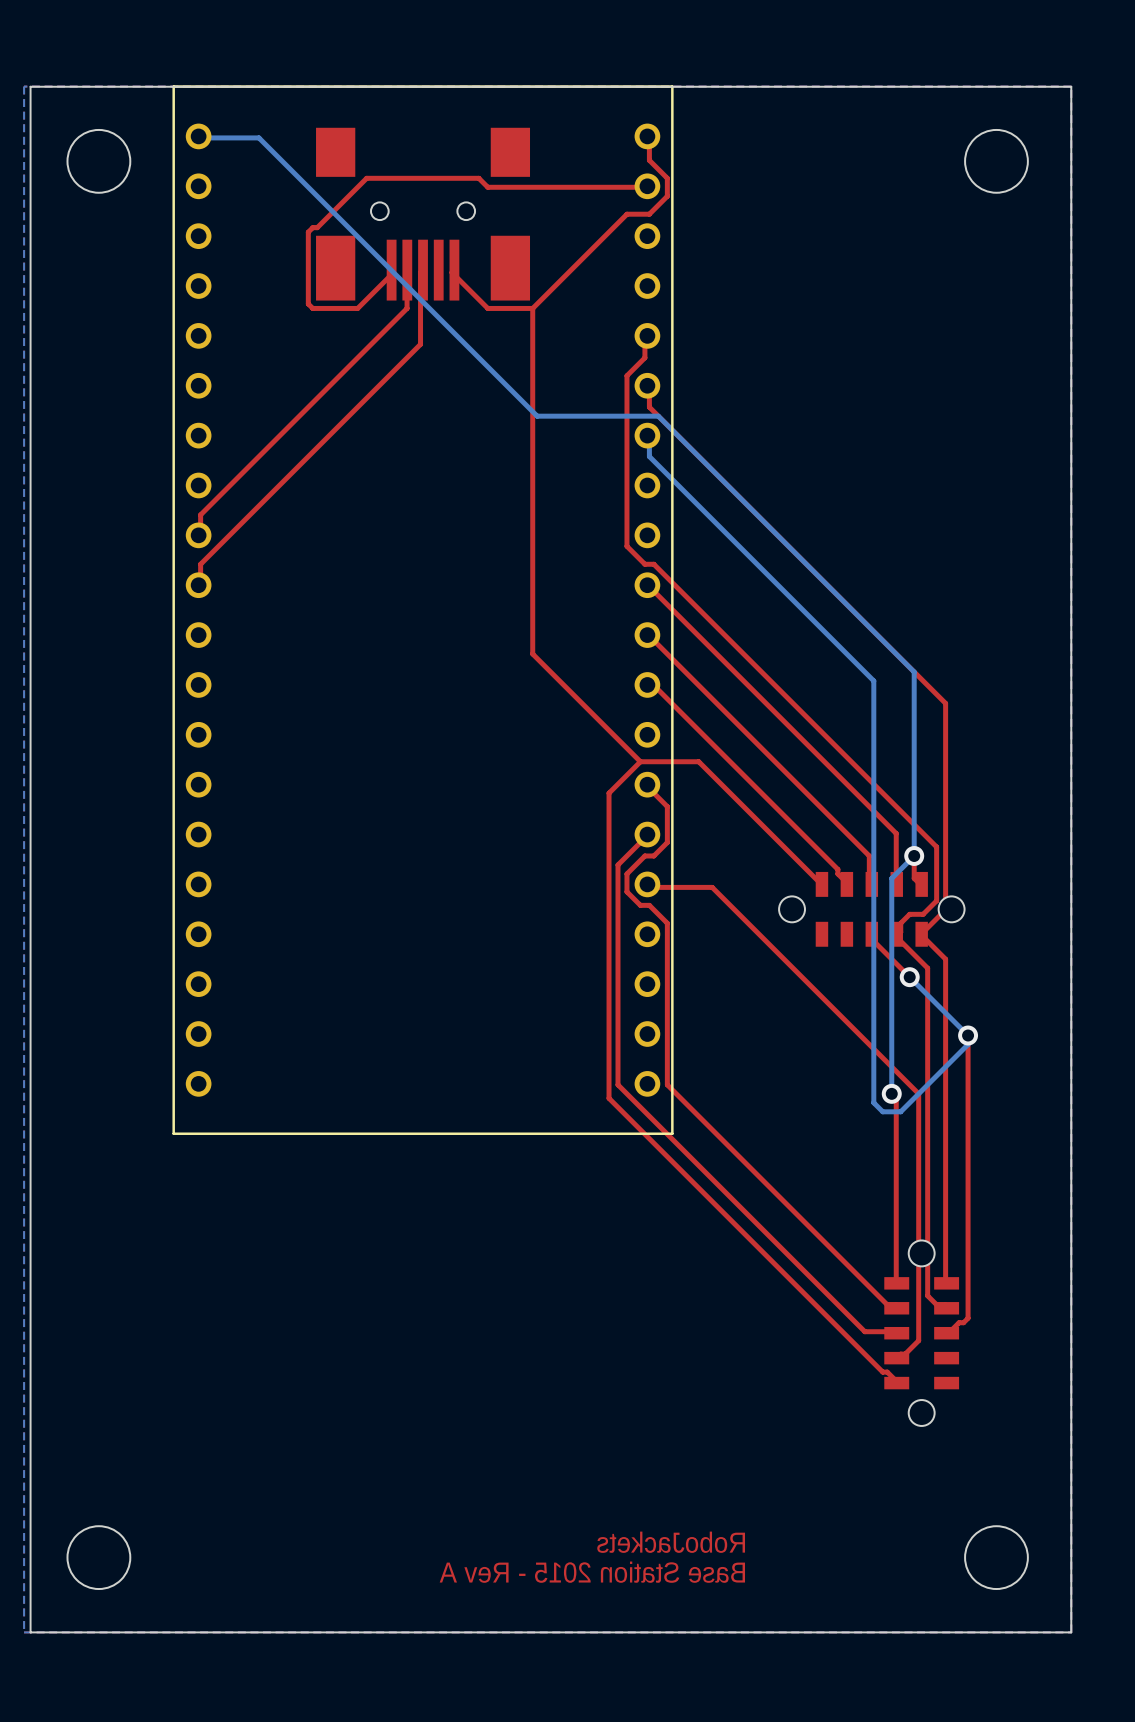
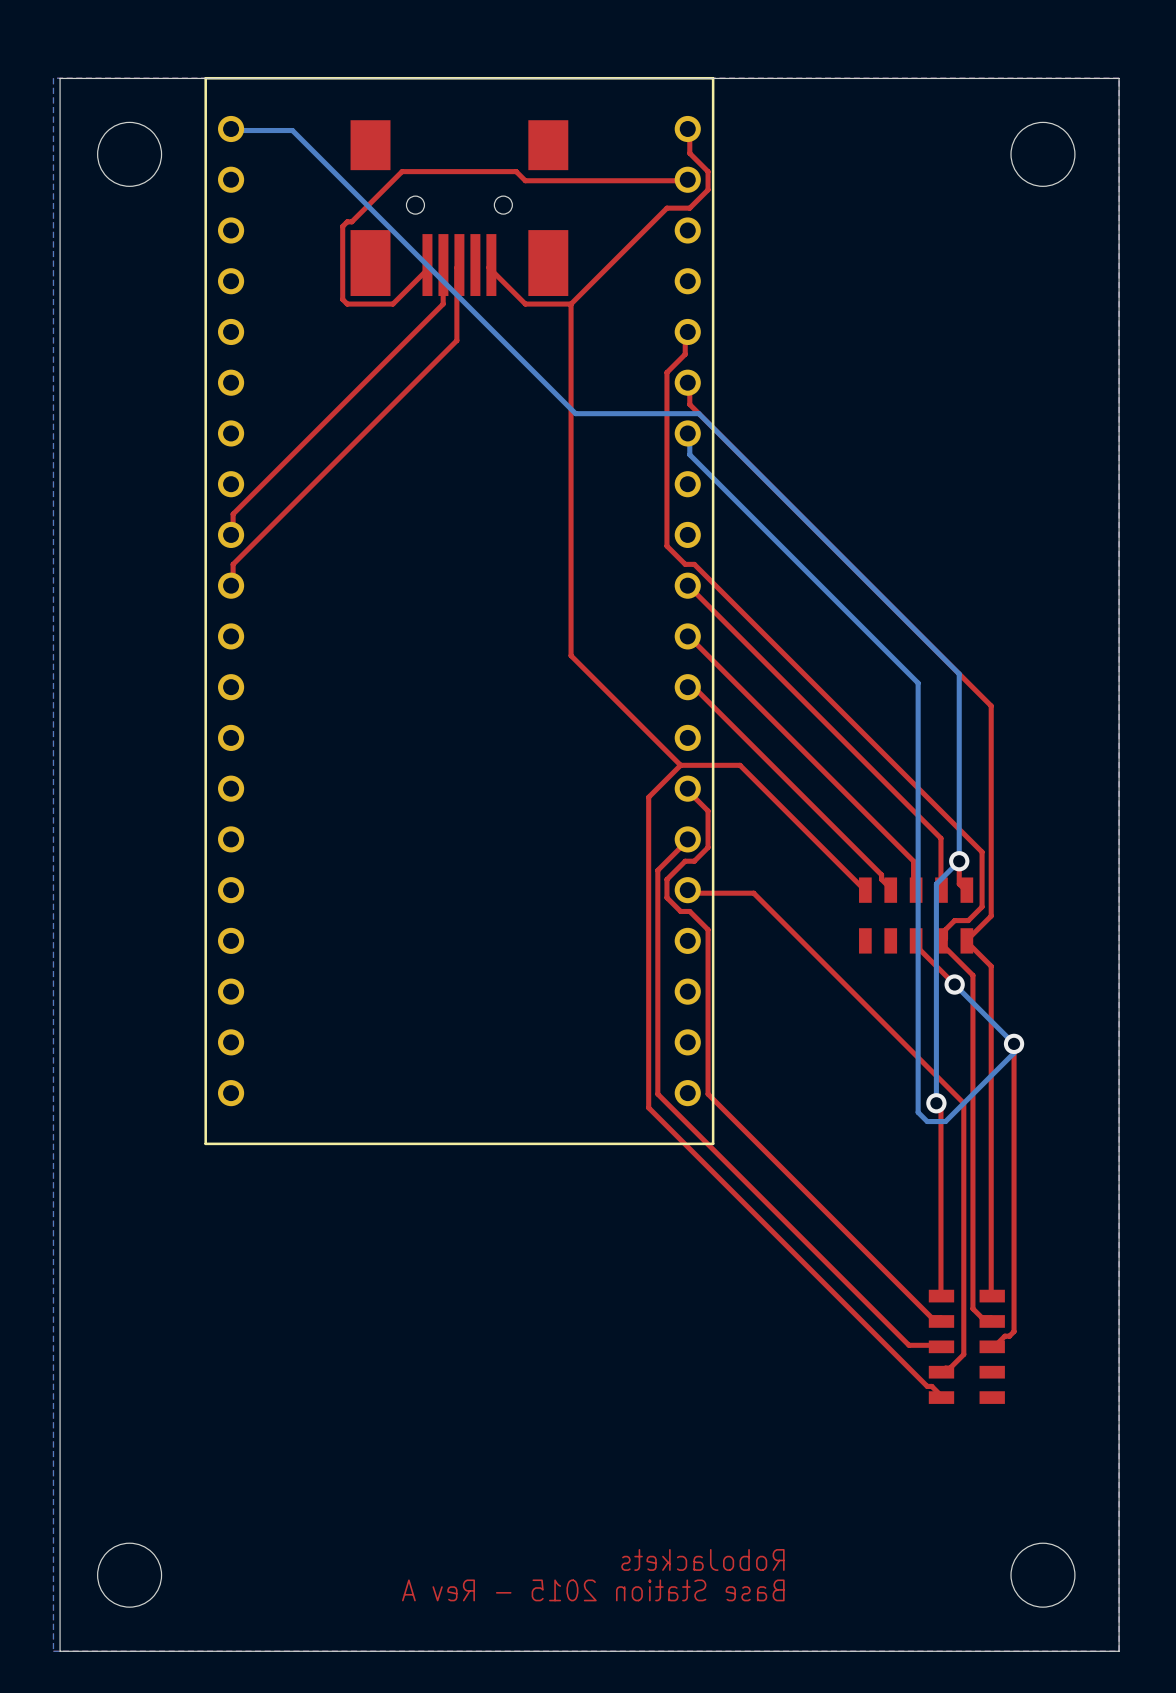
part footprint: [779, 871, 965, 947] -> [859, 877, 974, 954]
part footprint: [884, 1240, 960, 1426] -> [928, 1289, 1005, 1404]

